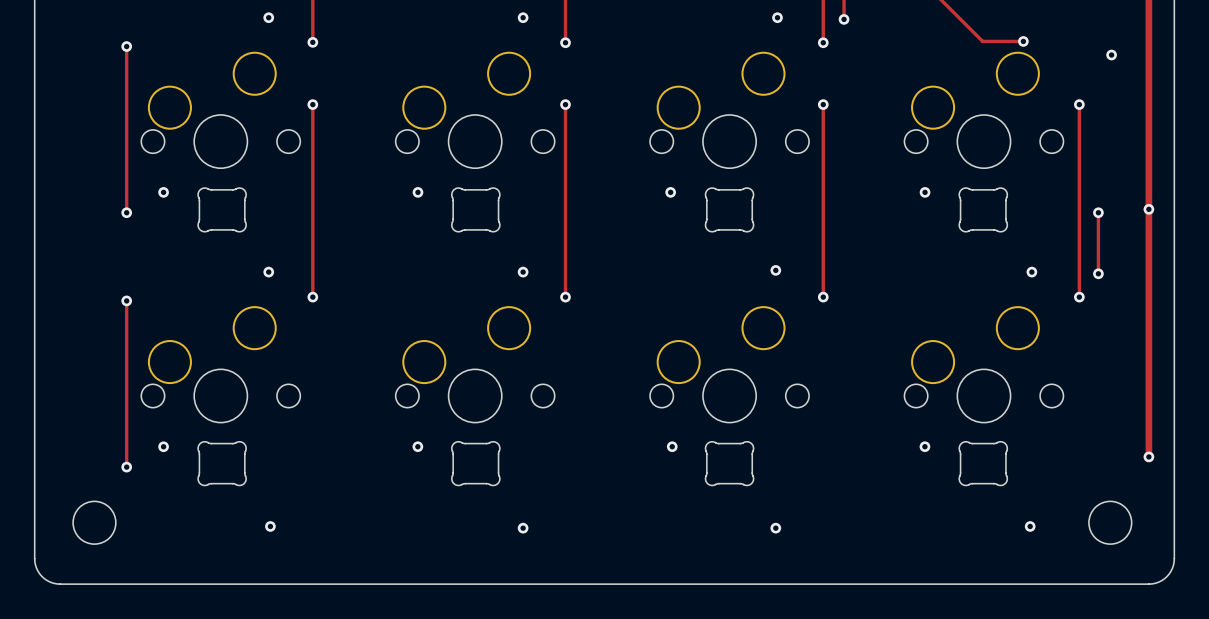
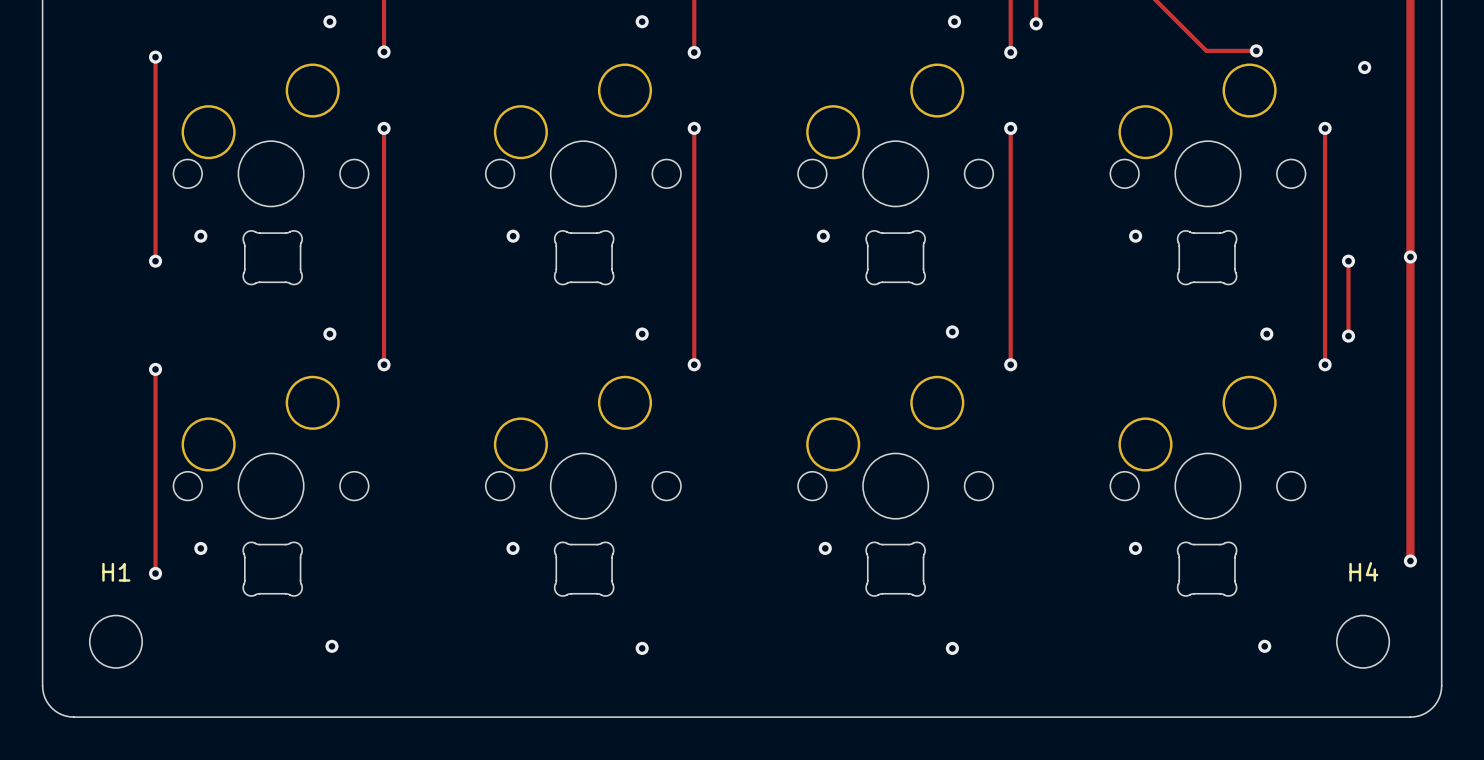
H4 name: none -> H4 (1363, 571)
H1 name: none -> H1 (116, 572)

